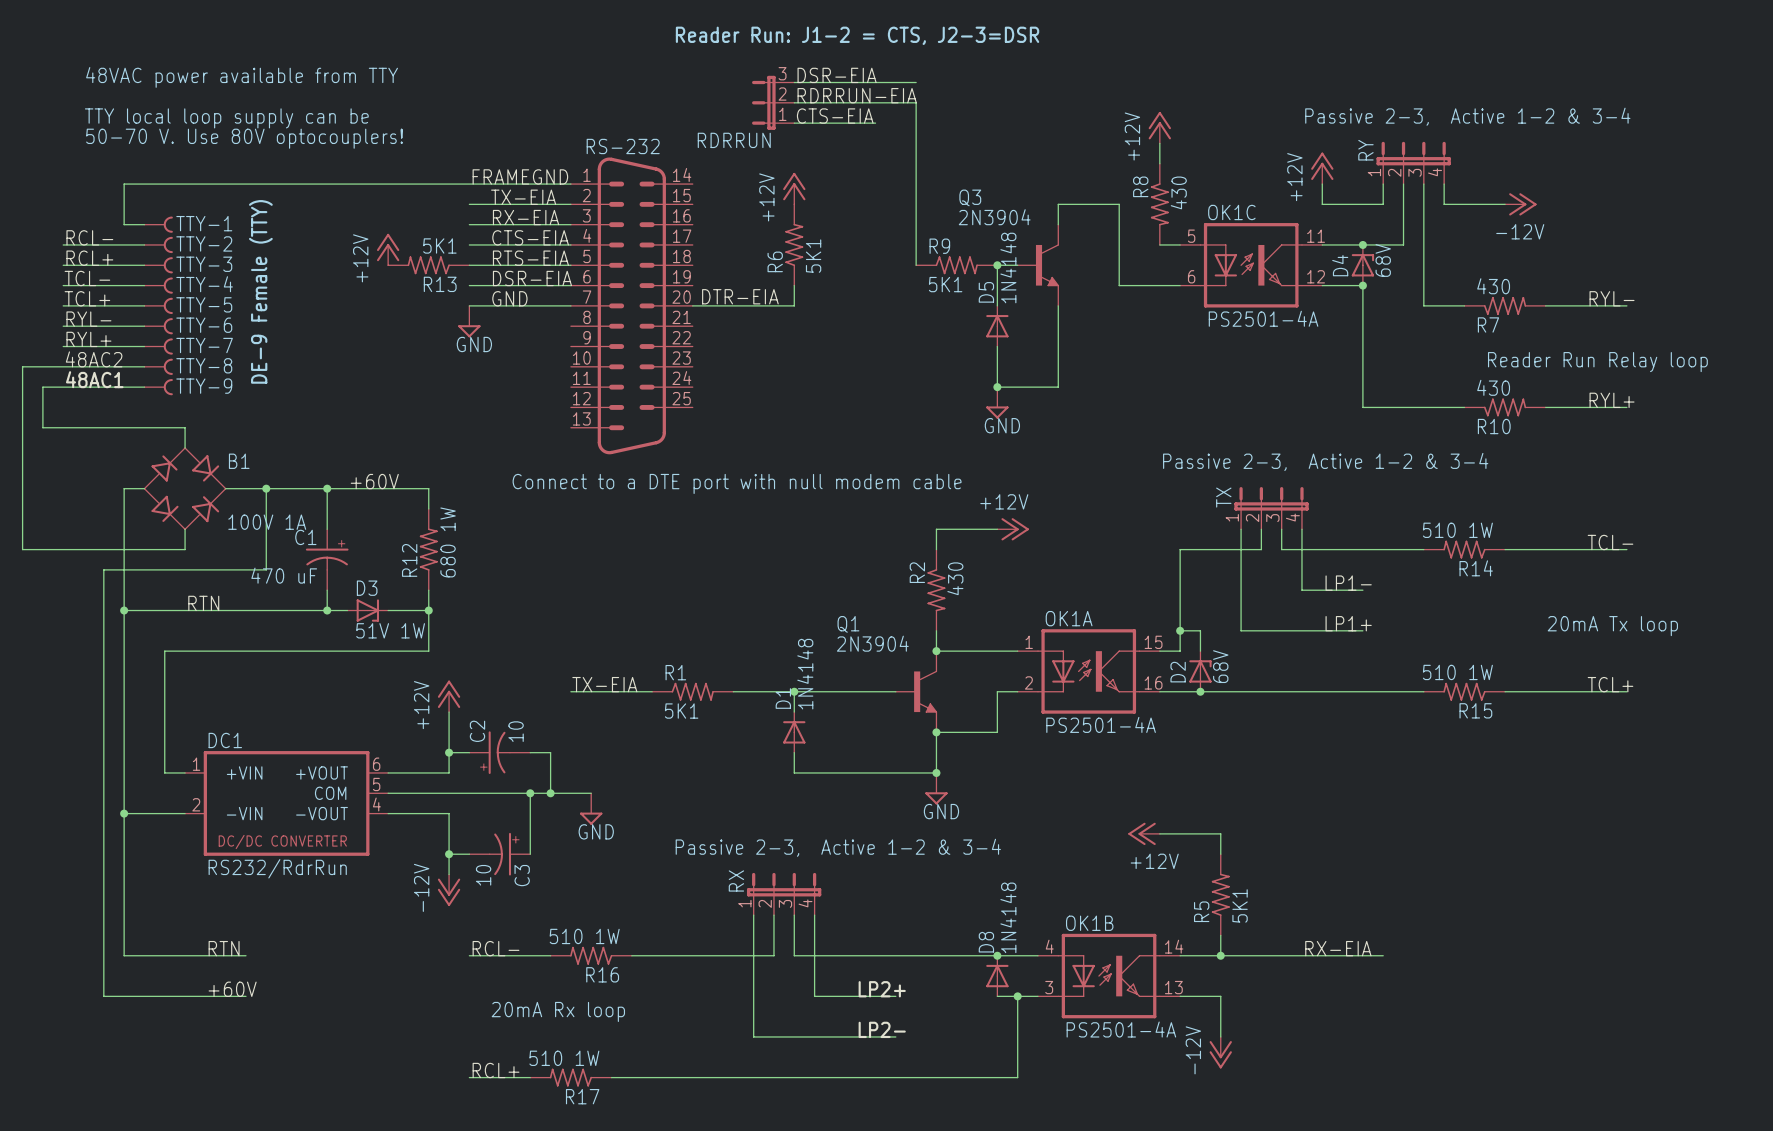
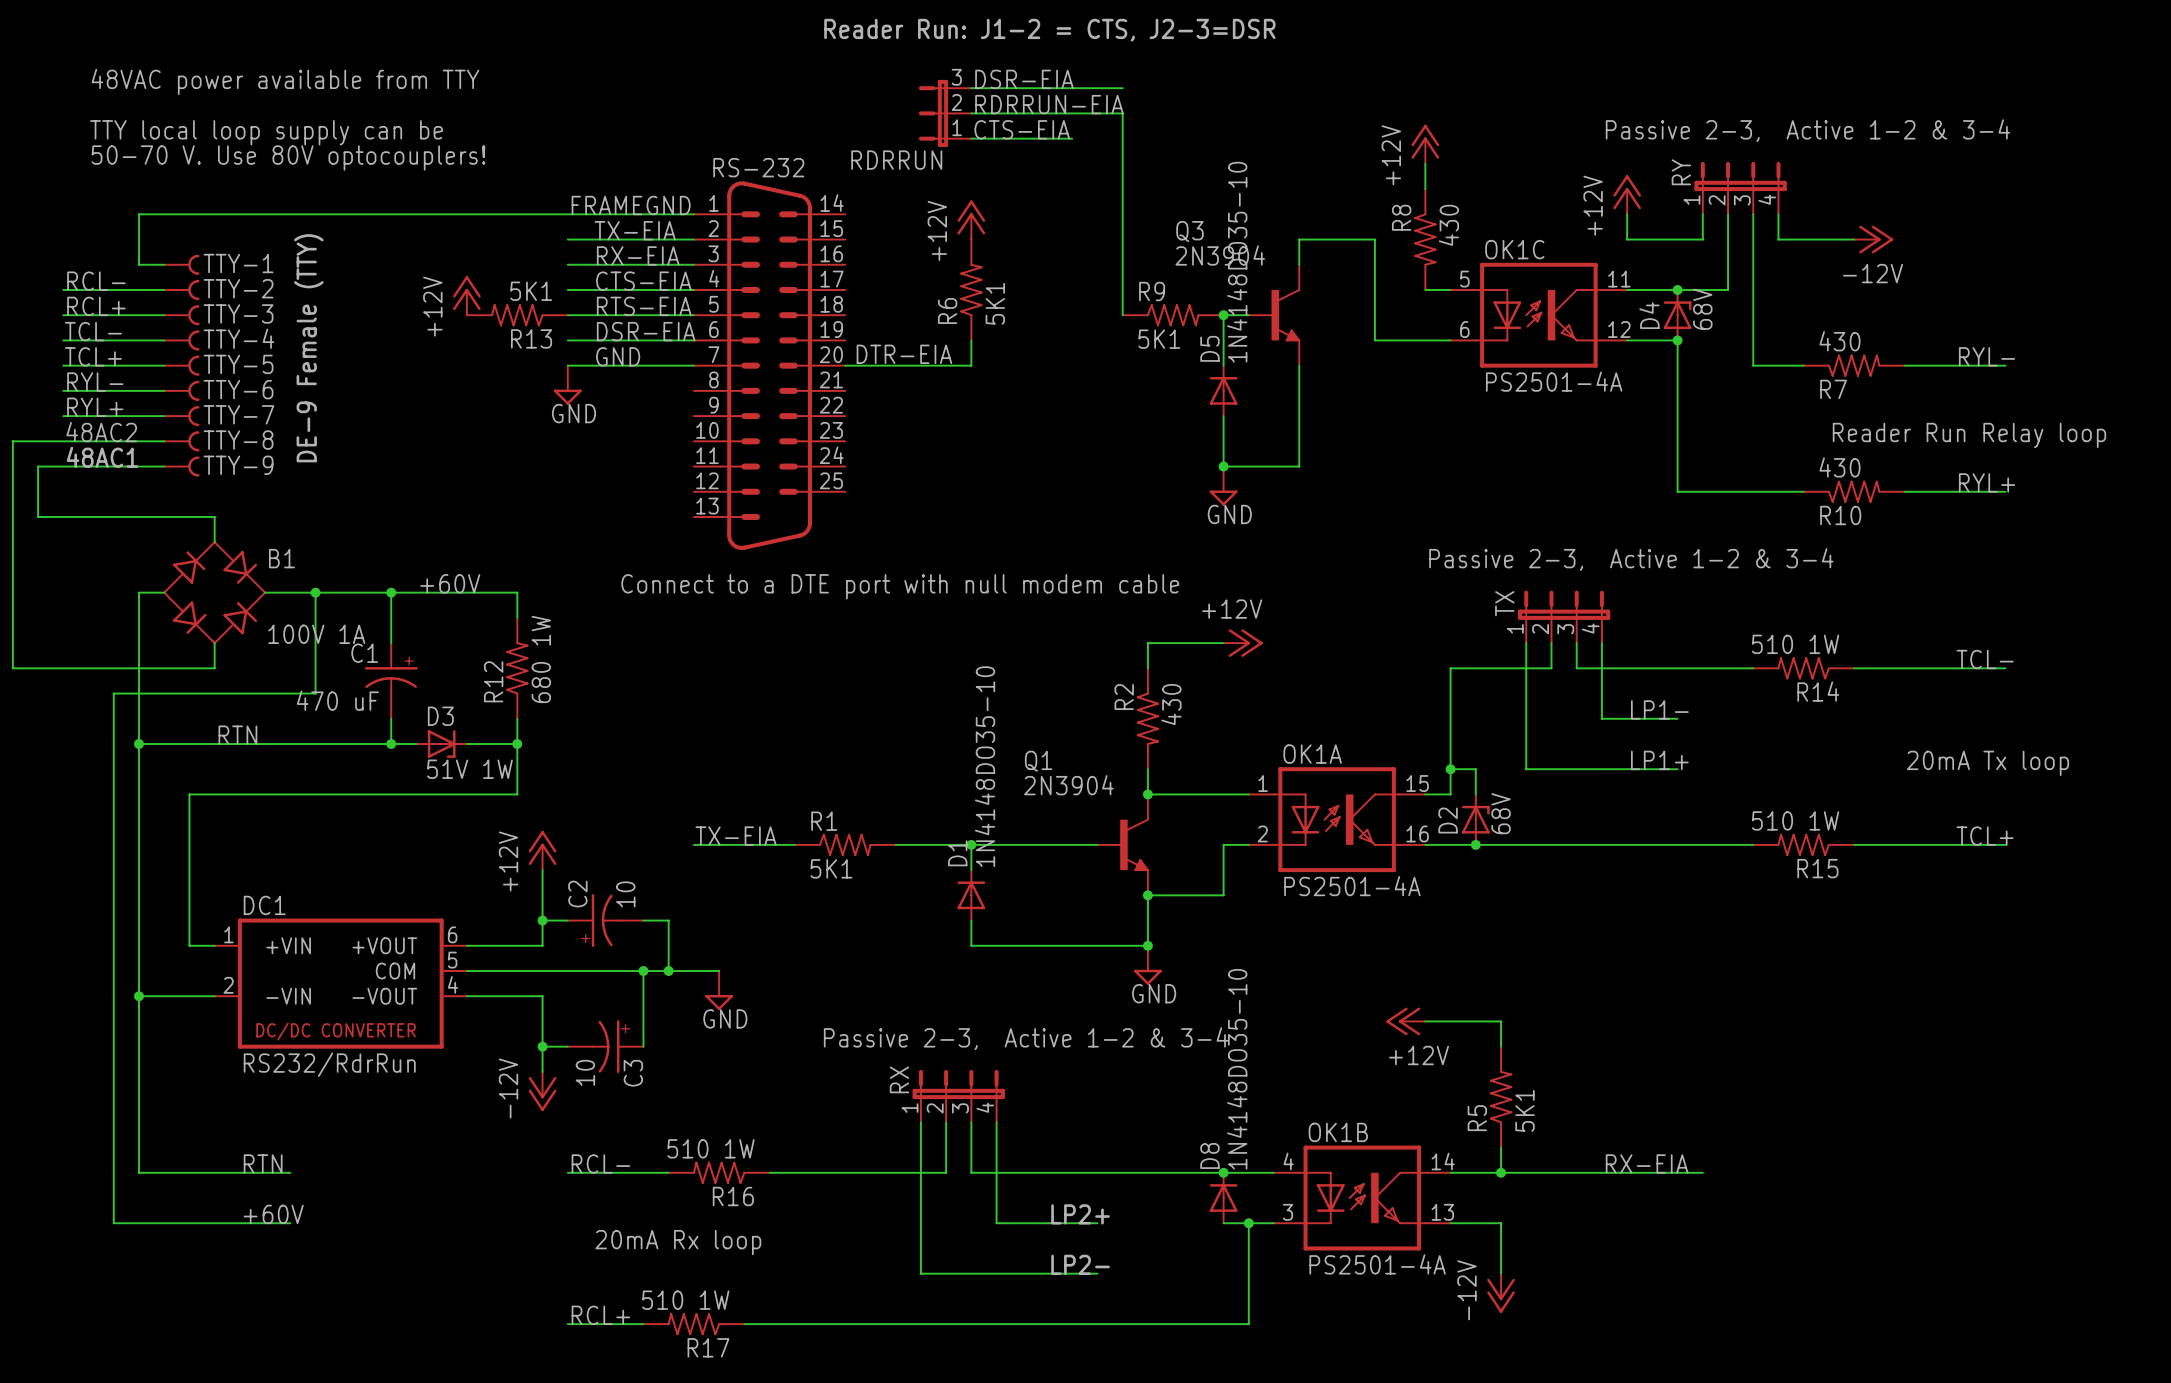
D5 value: 1N4148 (1008, 267) -> 1N4148DO35-10 (1237, 262)
D1 value: 1N4148 (805, 674) -> 1N4148DO35-10 (985, 766)
D8 value: 1N4148 (1008, 917) -> 1N4148DO35-10 (1237, 1069)

